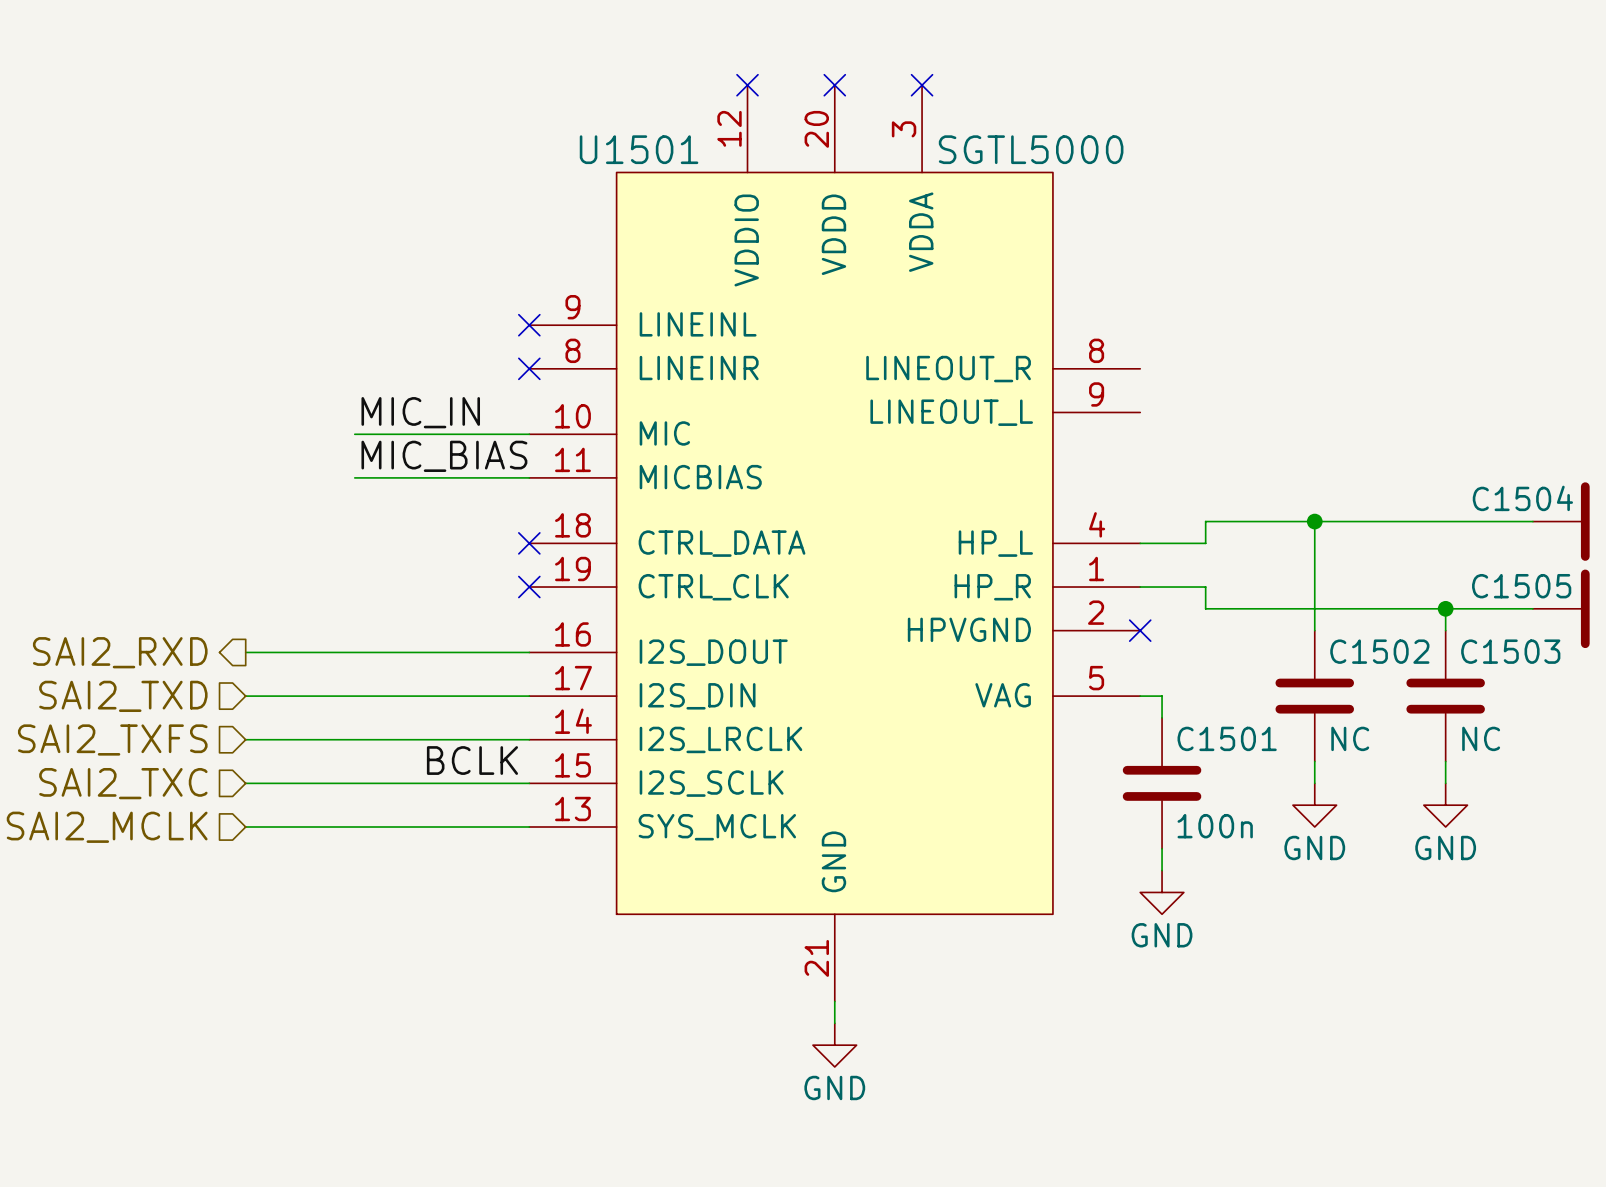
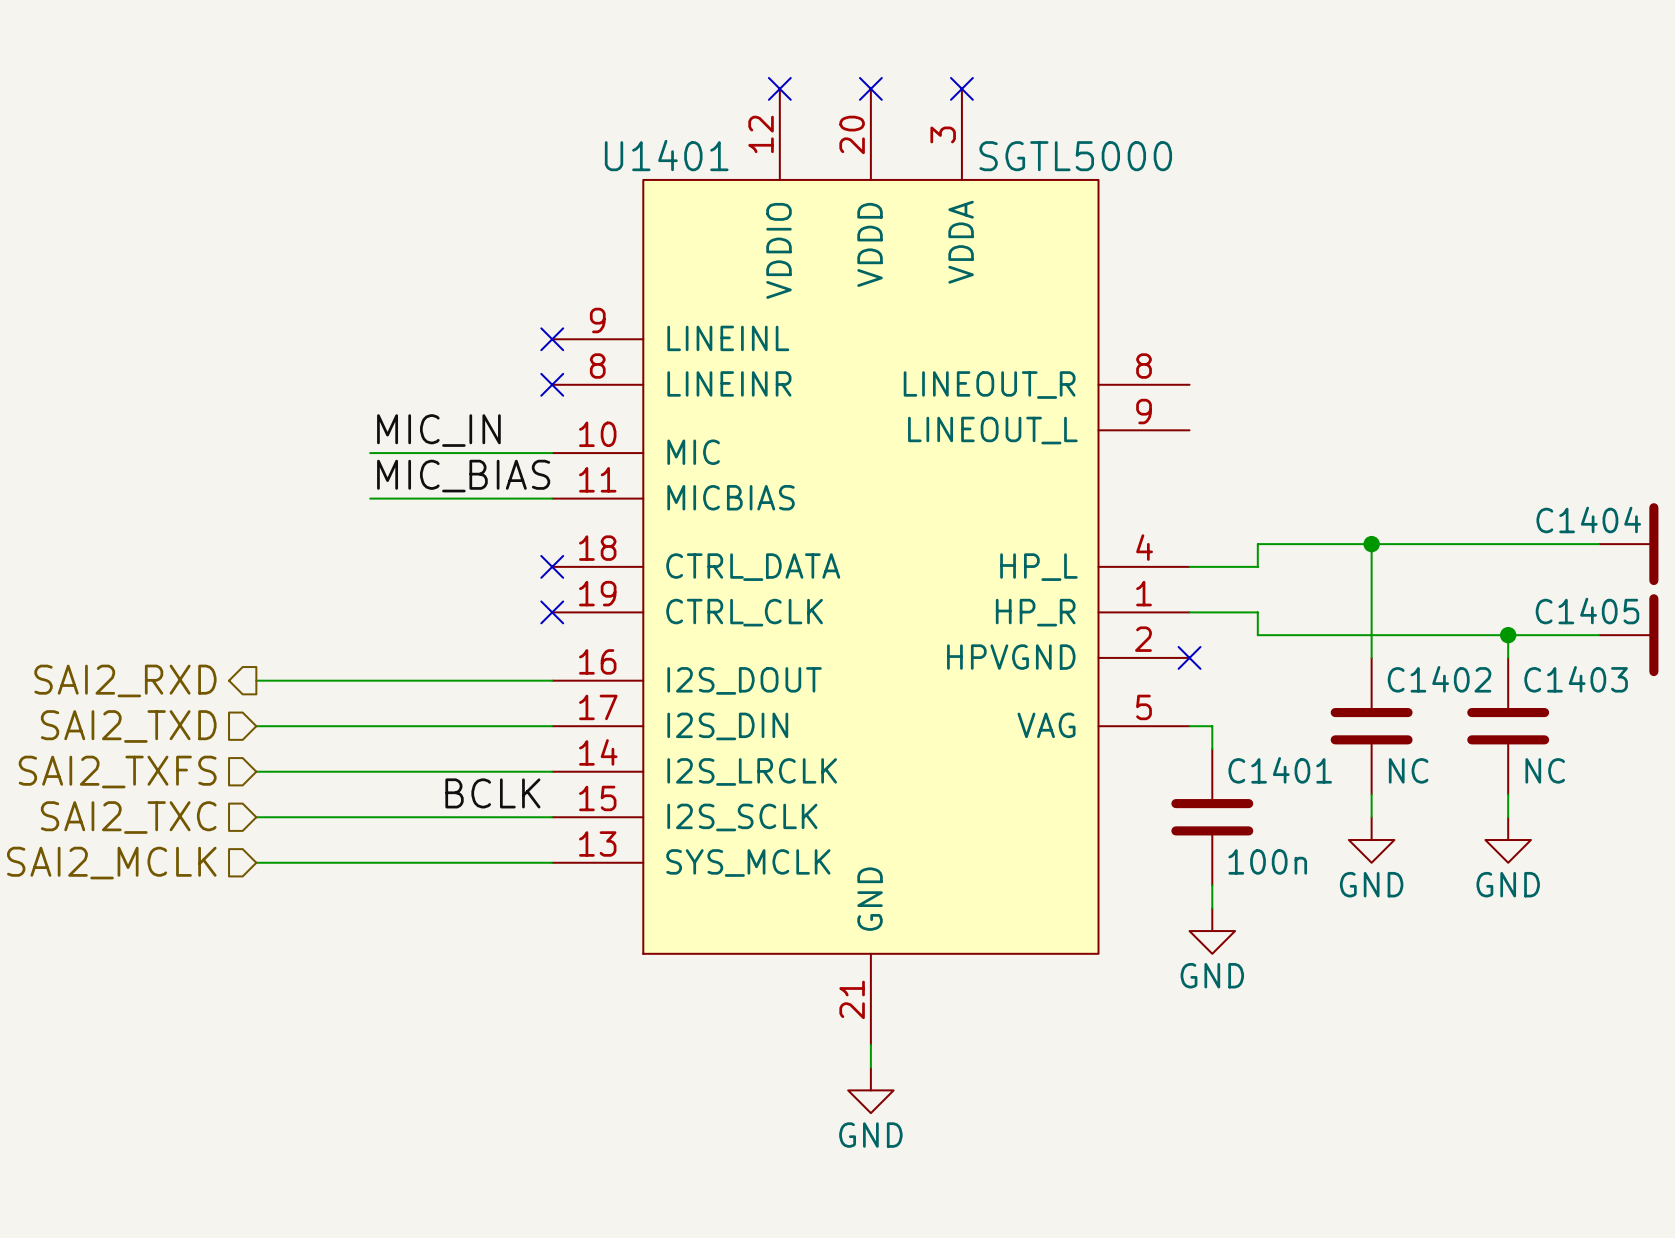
U1501 name: U1501 (639, 149) -> U1401 (666, 155)
C1504 name: C1504 (1522, 498) -> C1404 (1588, 519)
C1505 name: C1505 (1521, 586) -> C1405 (1587, 611)
C1502 name: C1502 (1379, 651) -> C1402 (1439, 679)
C1503 name: C1503 (1510, 651) -> C1403 (1576, 679)
C1501 name: C1501 (1227, 738) -> C1401 (1280, 770)

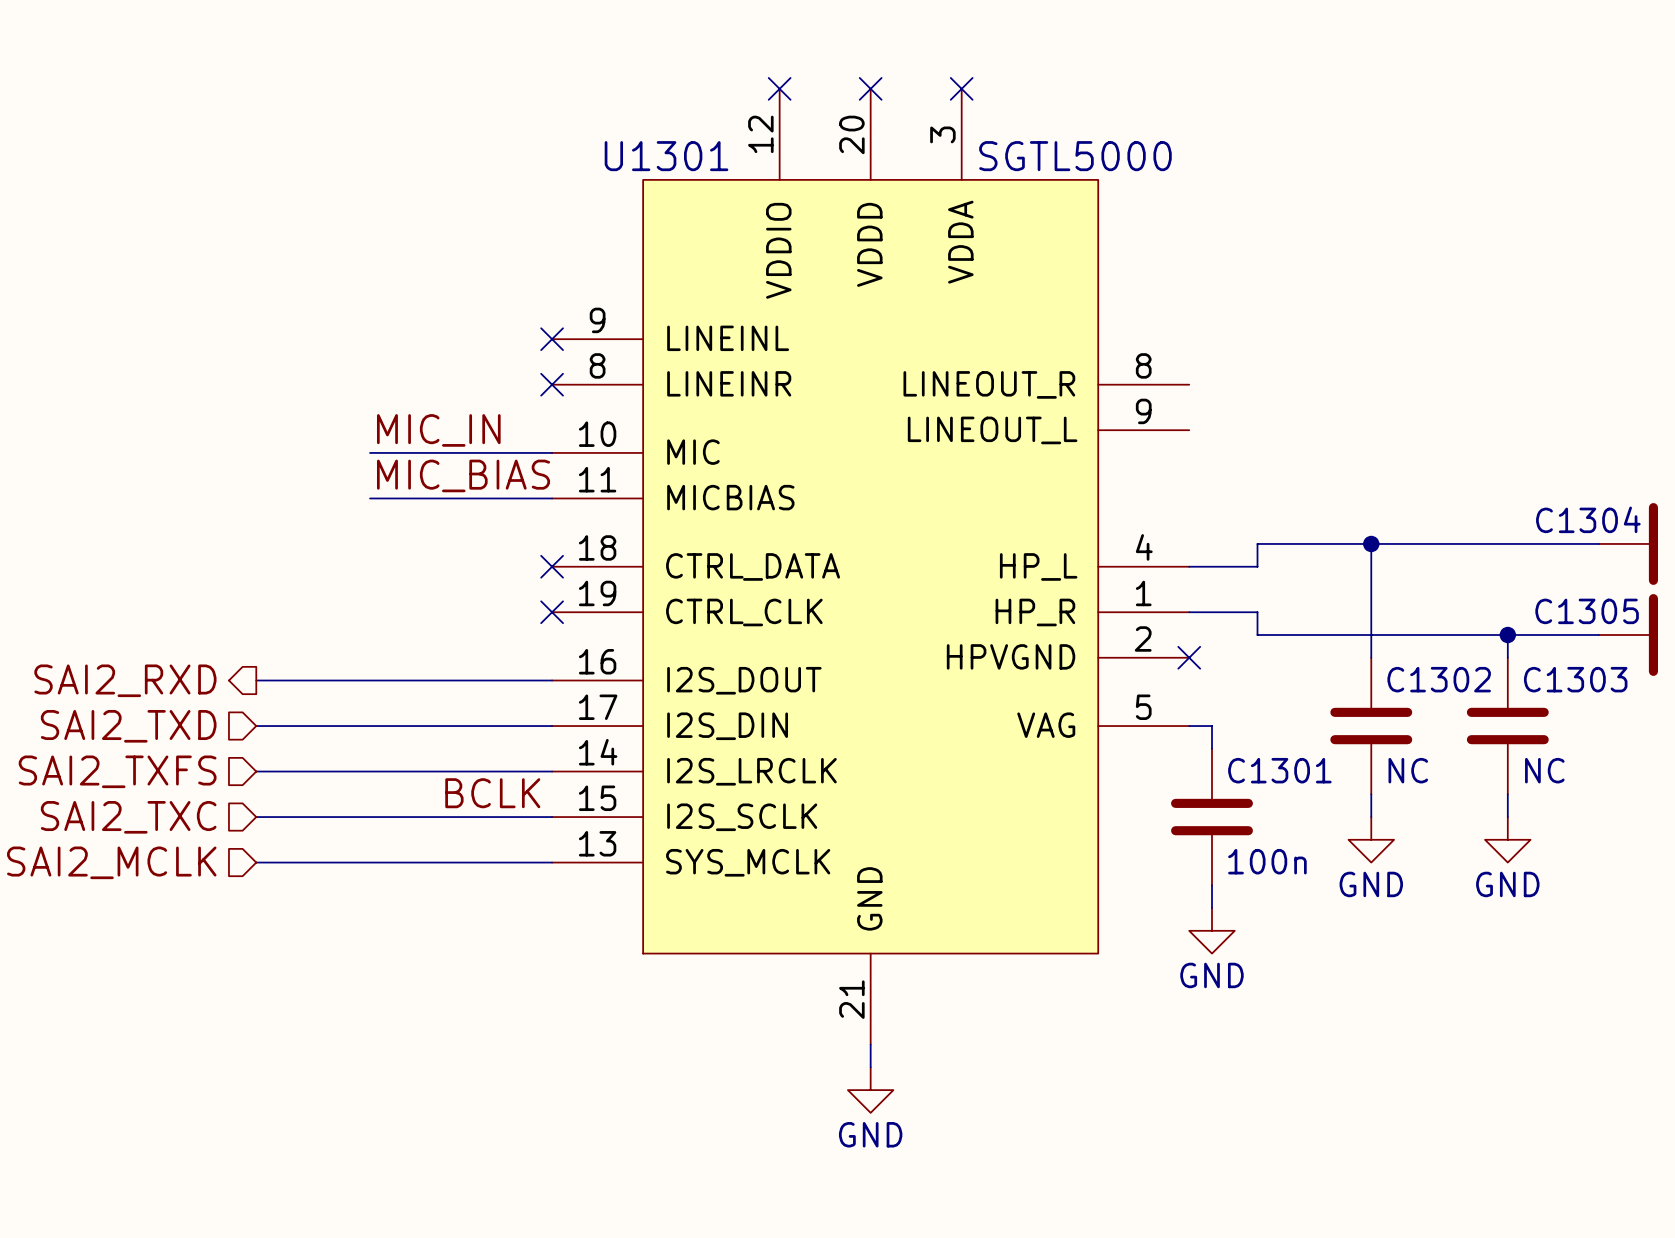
U1401 name: U1401 (666, 155) -> U1301 (666, 156)
C1404 name: C1404 (1588, 519) -> C1304 (1588, 519)
C1405 name: C1405 (1587, 611) -> C1305 (1587, 611)
C1402 name: C1402 (1439, 679) -> C1302 (1439, 679)
C1403 name: C1403 (1576, 679) -> C1303 (1575, 679)
C1401 name: C1401 (1280, 770) -> C1301 (1279, 770)

